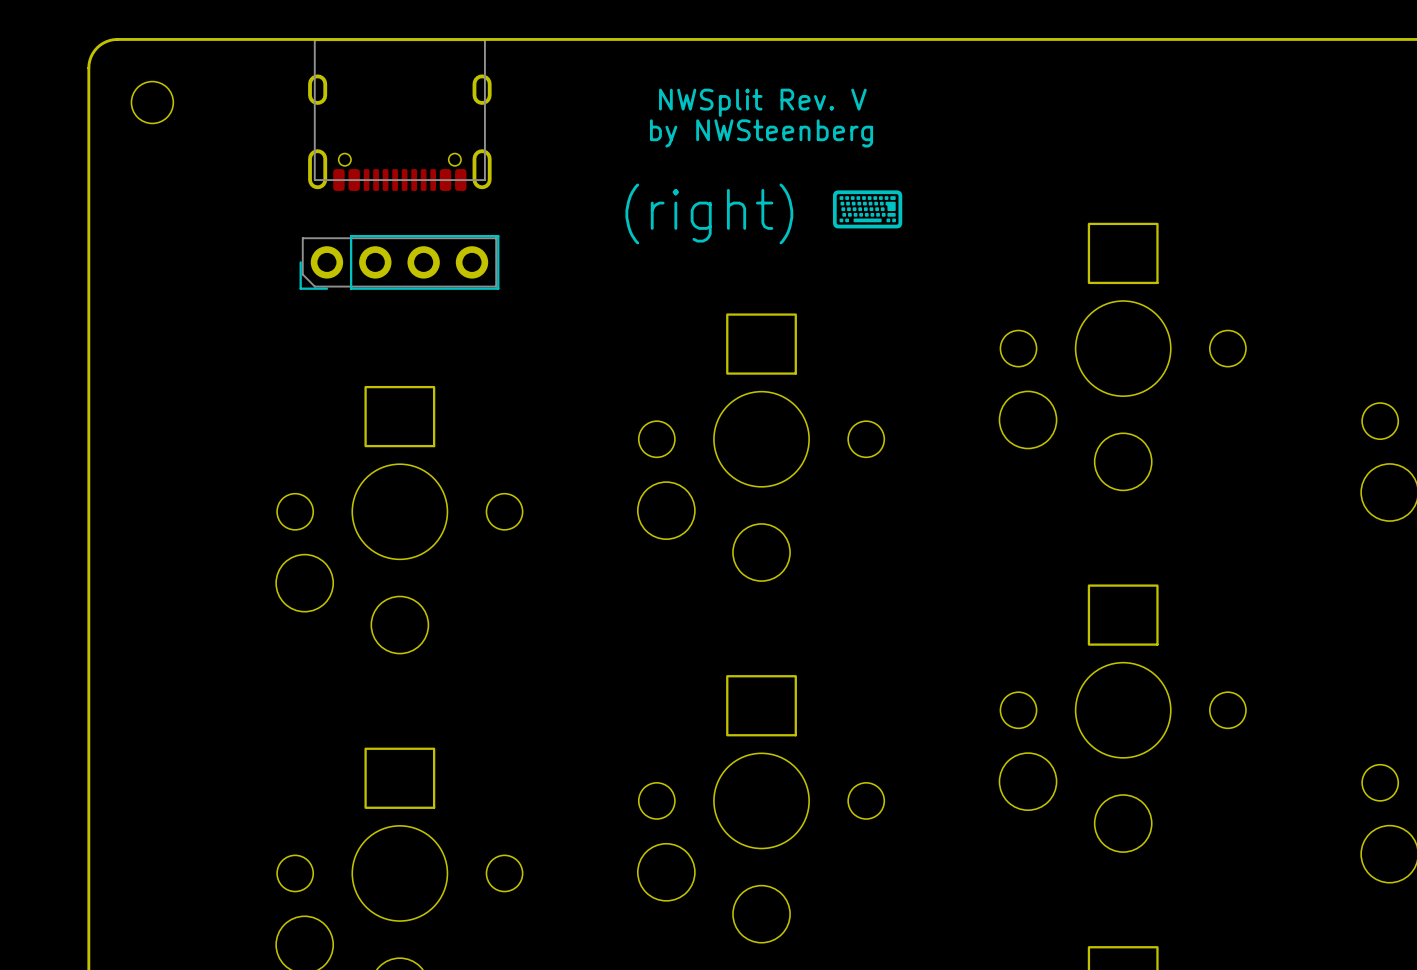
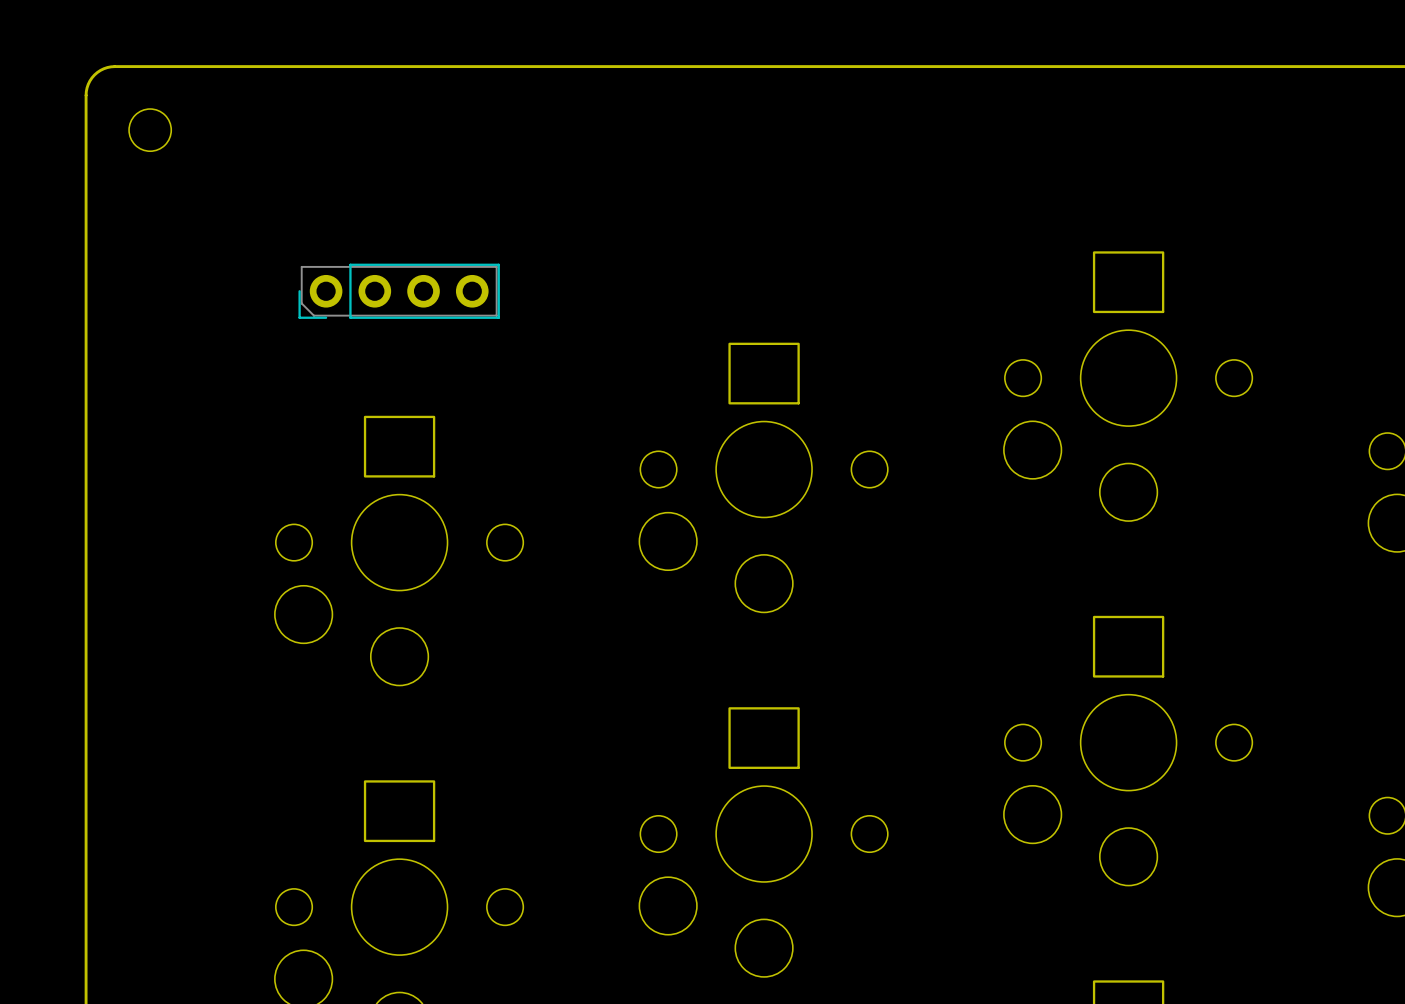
text: NWSplit Rev. V (762, 102) -> none
part: (399, 115) -> none
text: by NWSteenberg (761, 133) -> none
text: (right) ⌨ (764, 213) -> none

